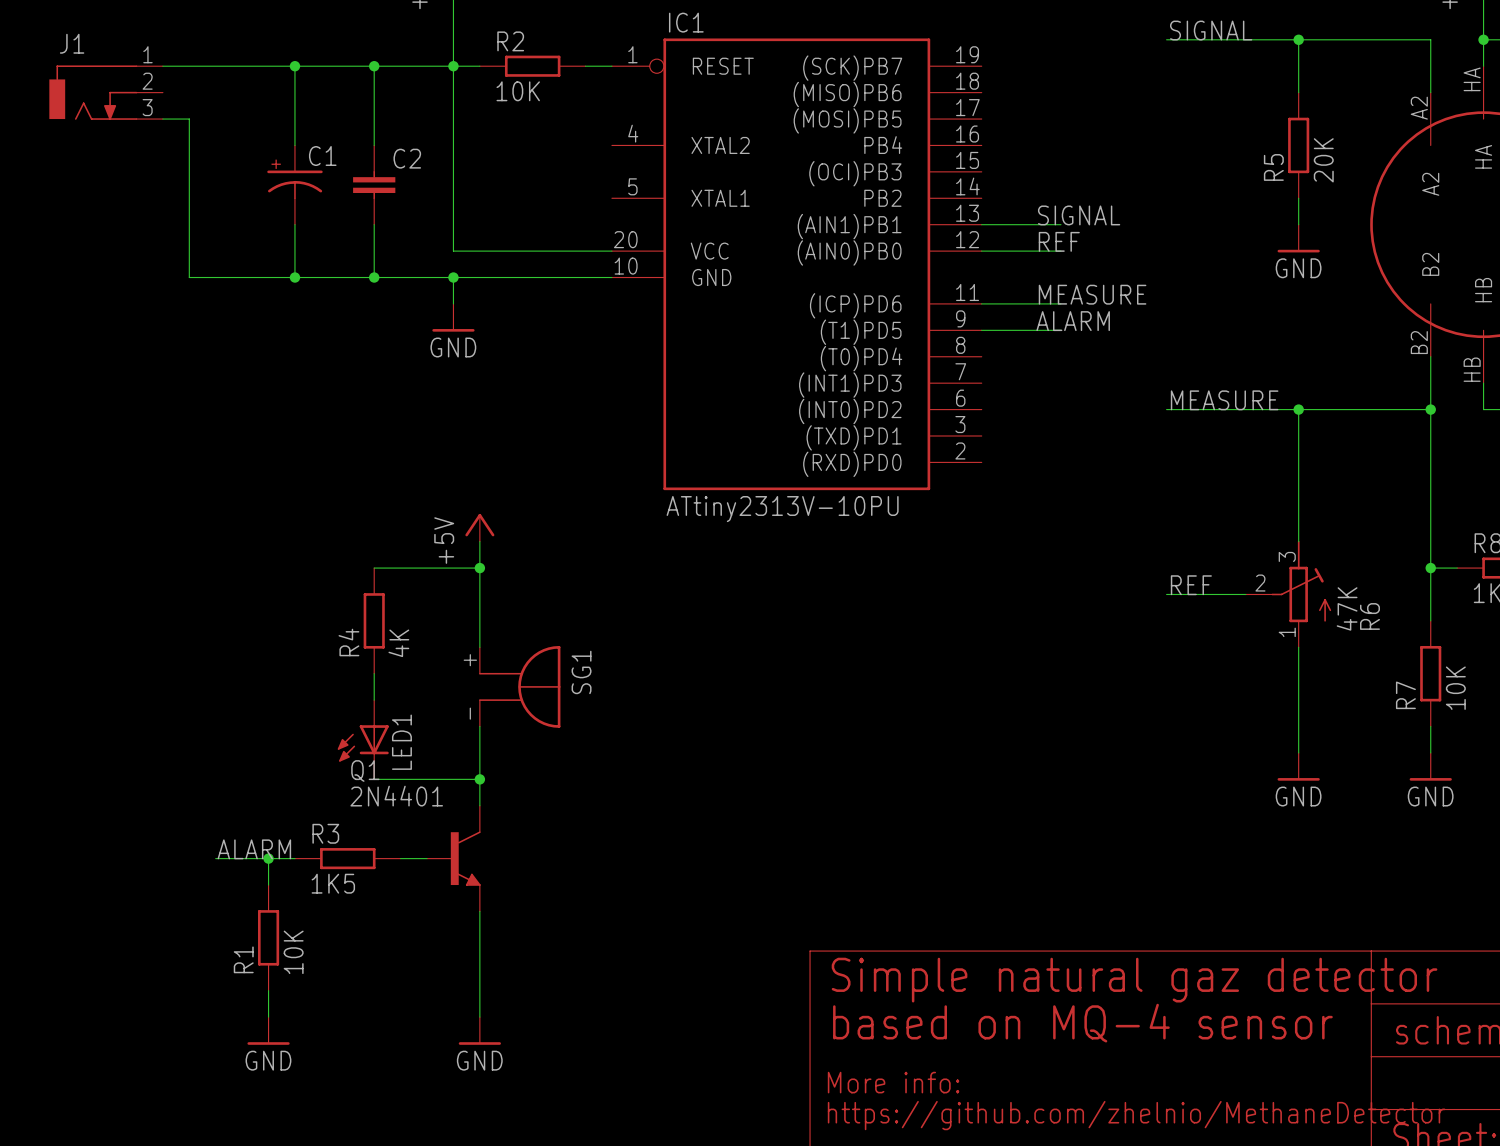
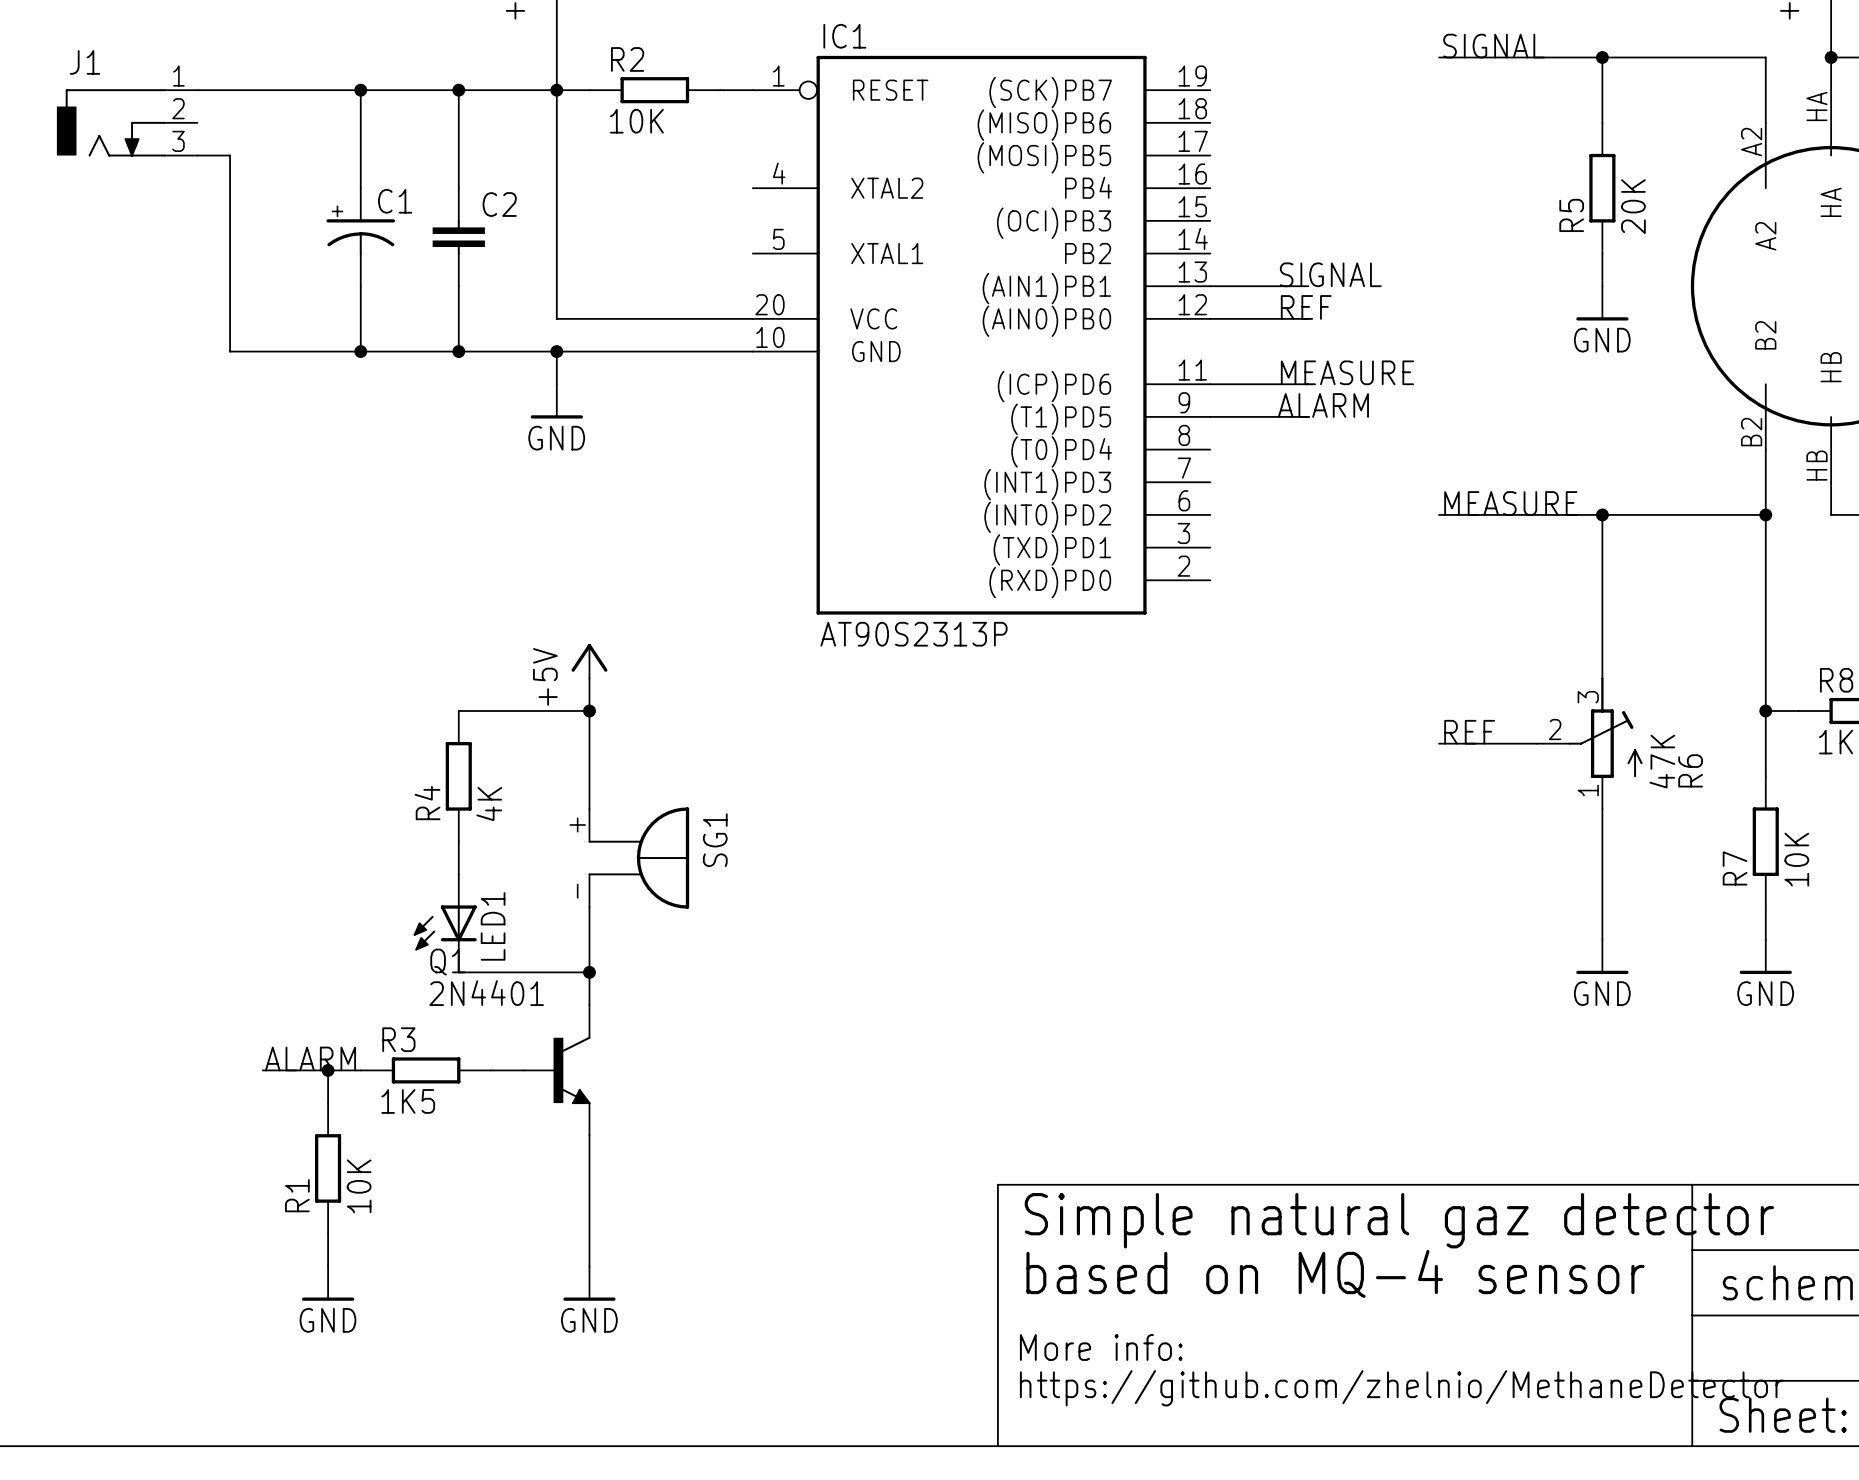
IC1 value: ATtiny2313V-10PU (782, 509) -> AT90S2313P (914, 634)

